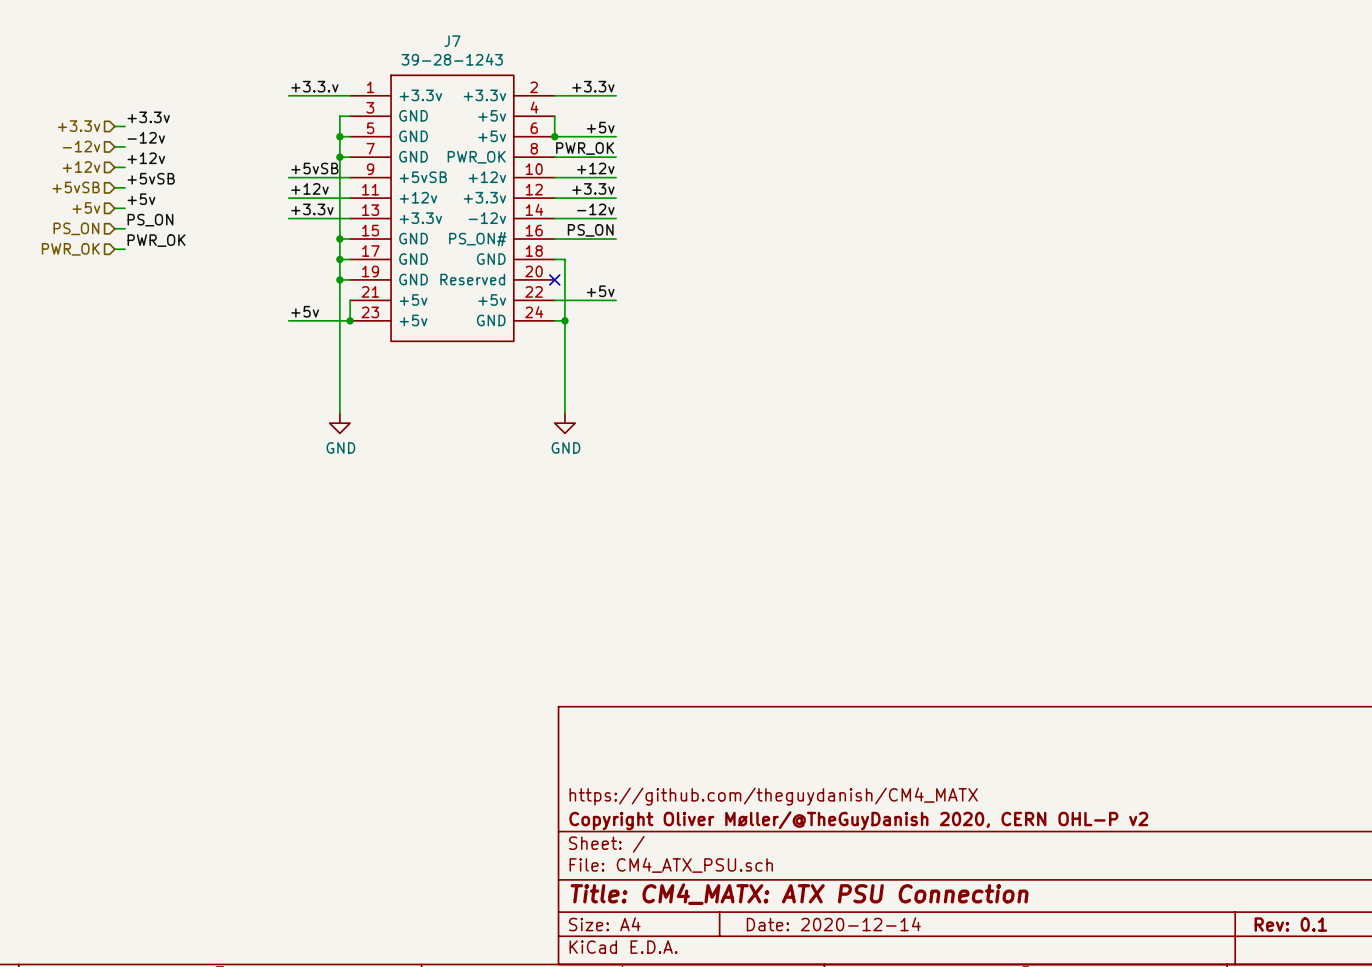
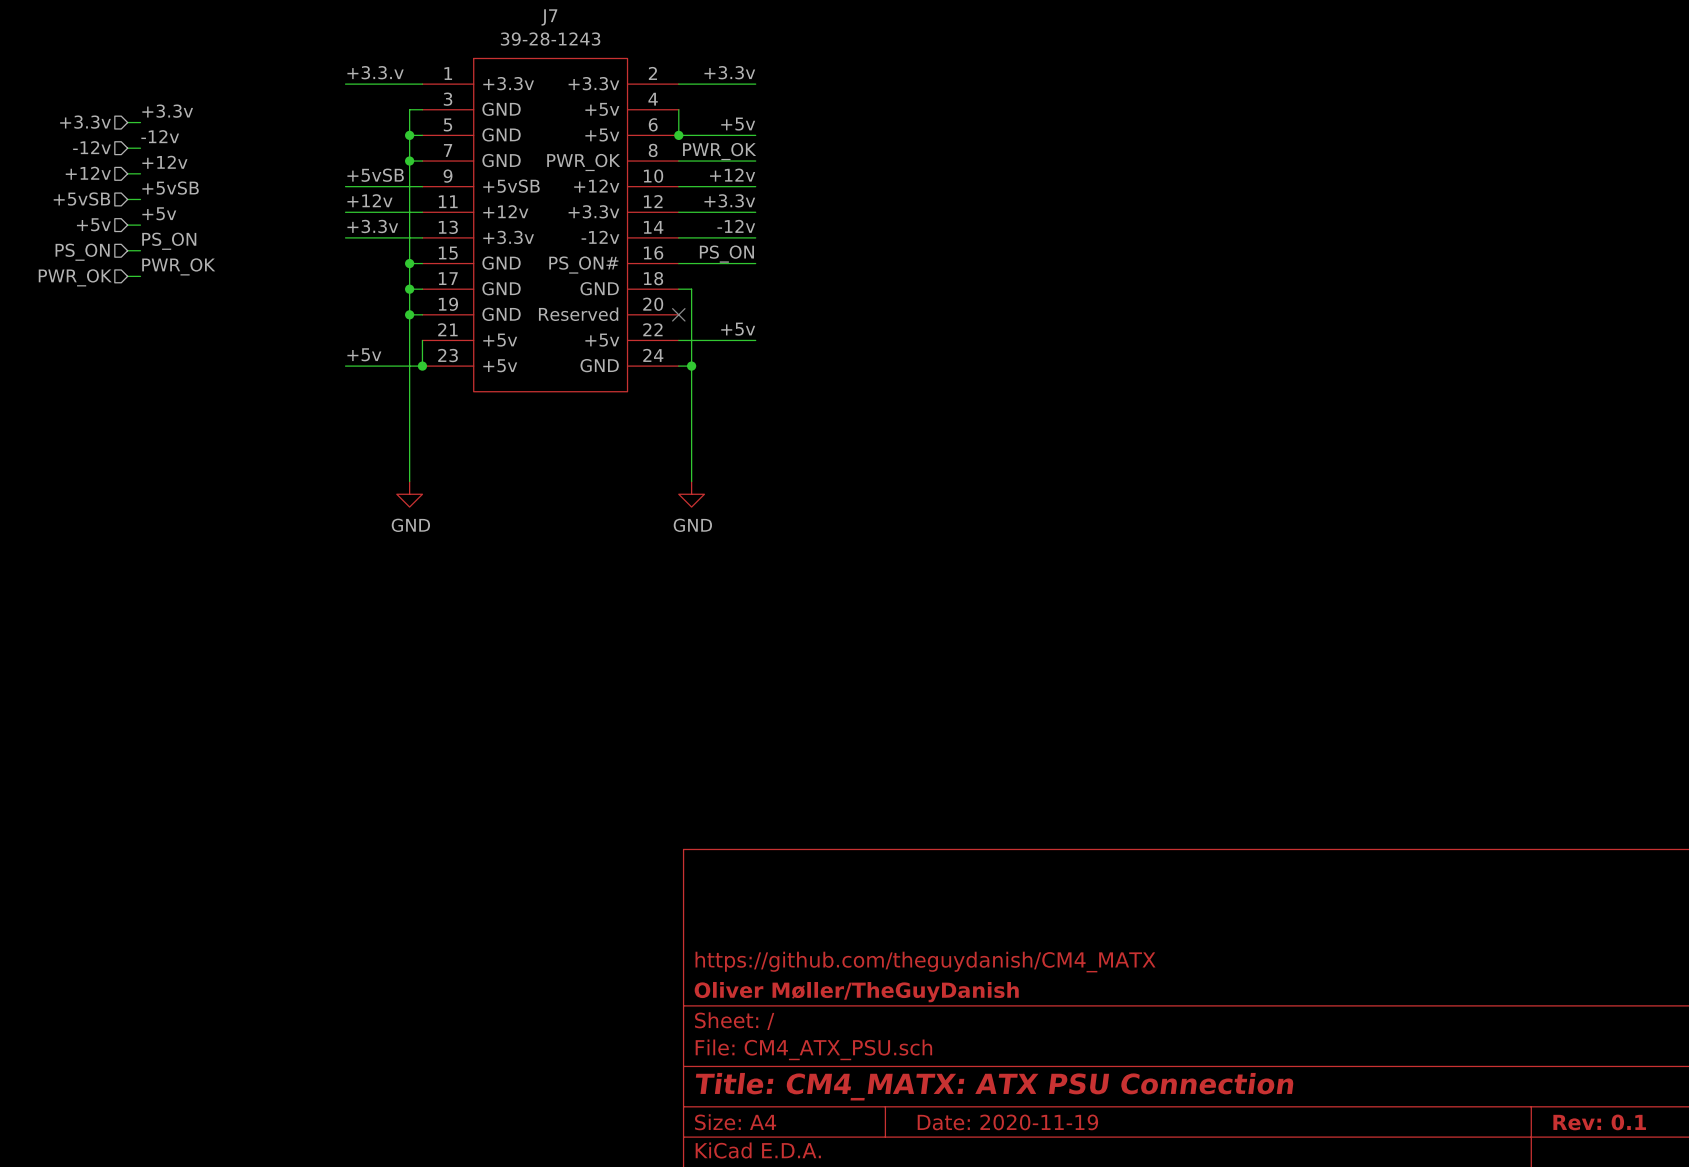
title block: Copyright Oliver Møller/@TheGuyDanish 2020, CERN OHL-P v2 (858, 820) -> Oliver Møller/TheGuyDanish (856, 992)
title block: Date: 2020-12-14 (833, 924) -> Date: 2020-11-19 (1007, 1122)

